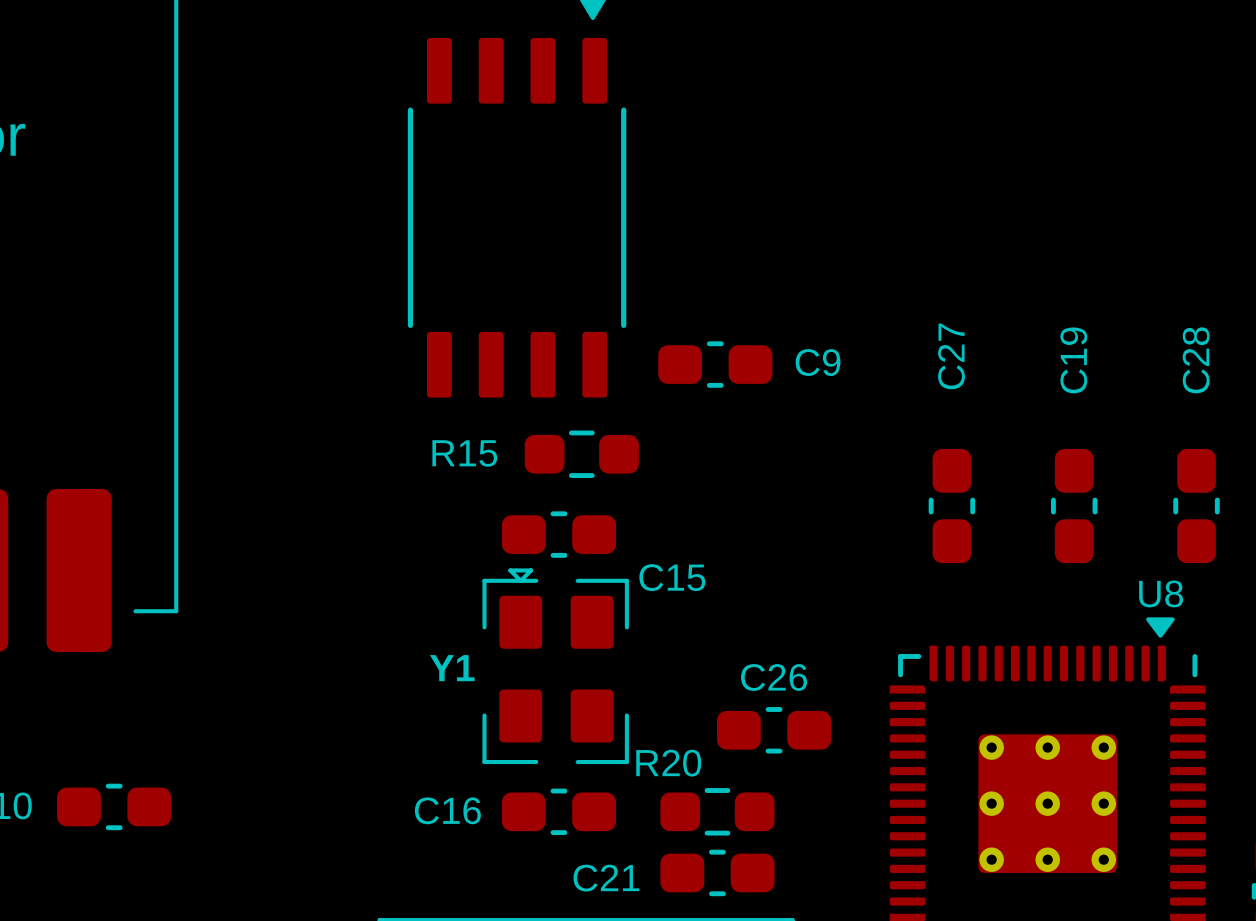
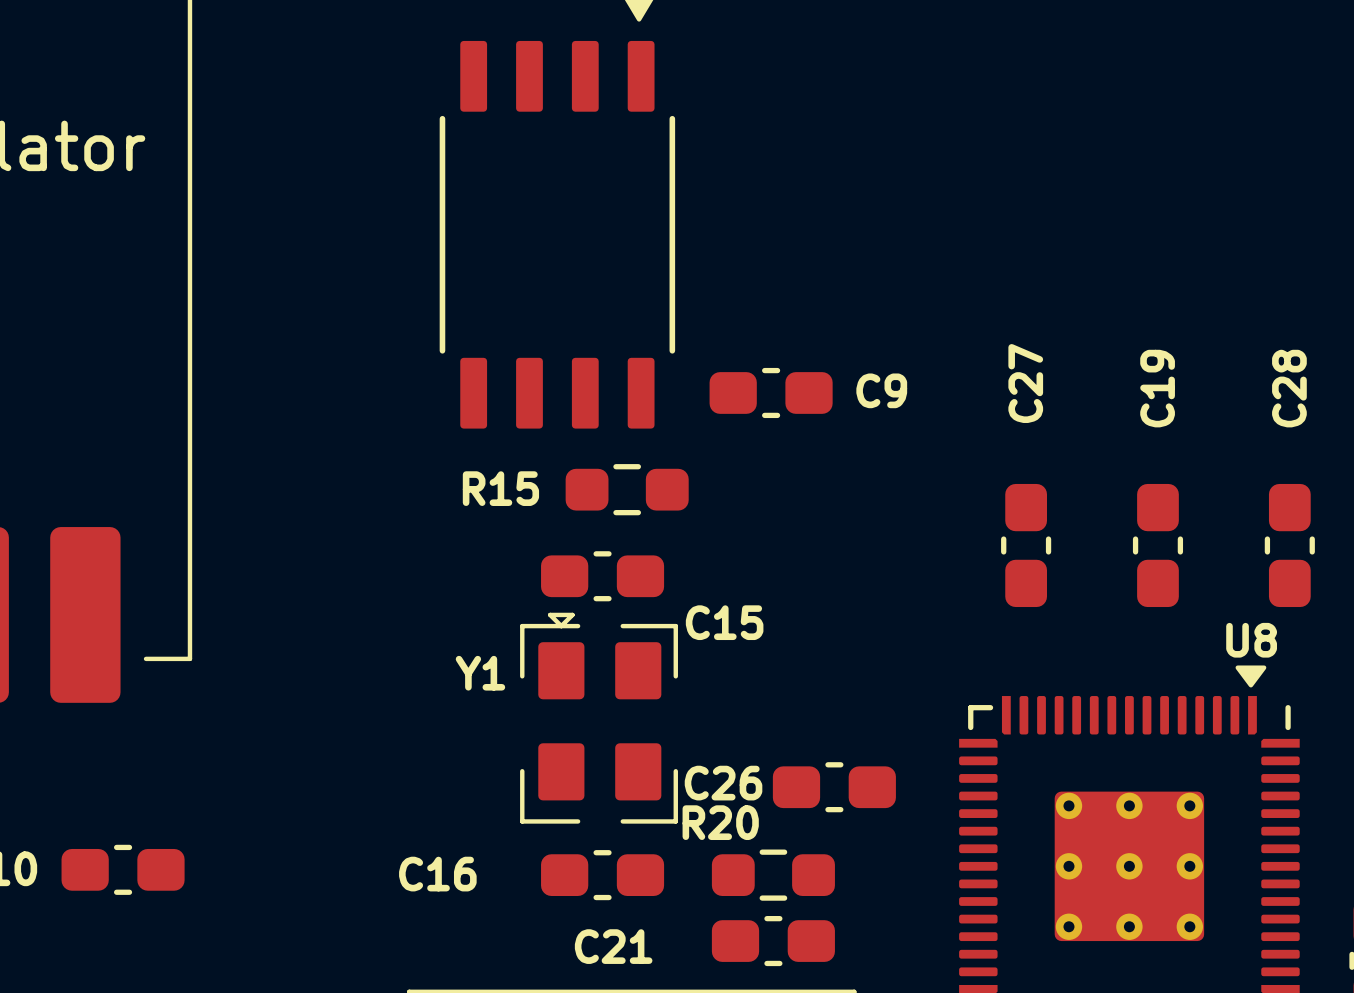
Y1 name position: Y1 (452, 668) -> Y1 (480, 673)
C26 name position: C26 (774, 677) -> C26 (723, 783)
C16 name position: C16 (447, 810) -> C16 (437, 874)
C21 name position: C21 (606, 878) -> C21 (613, 946)

